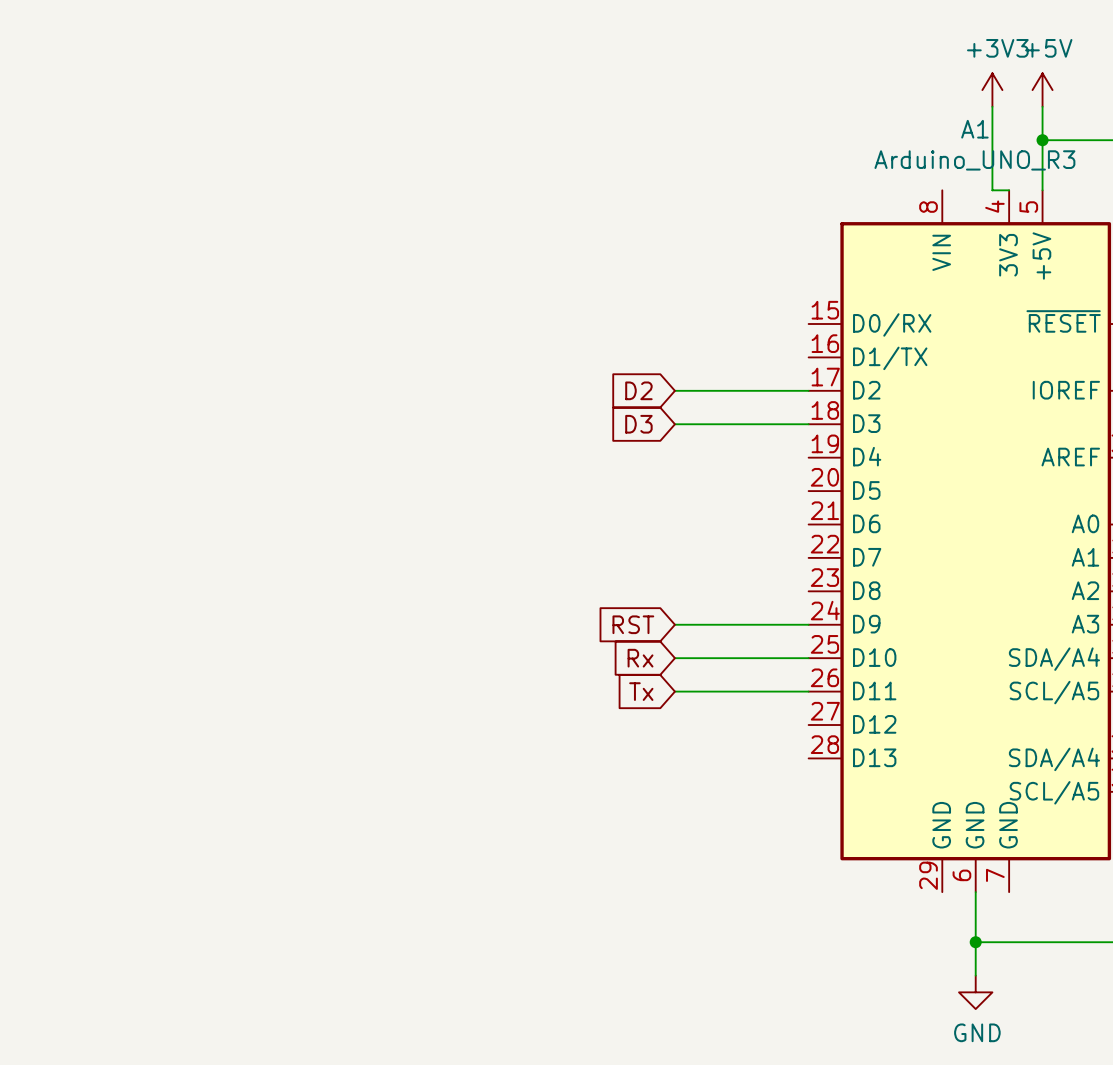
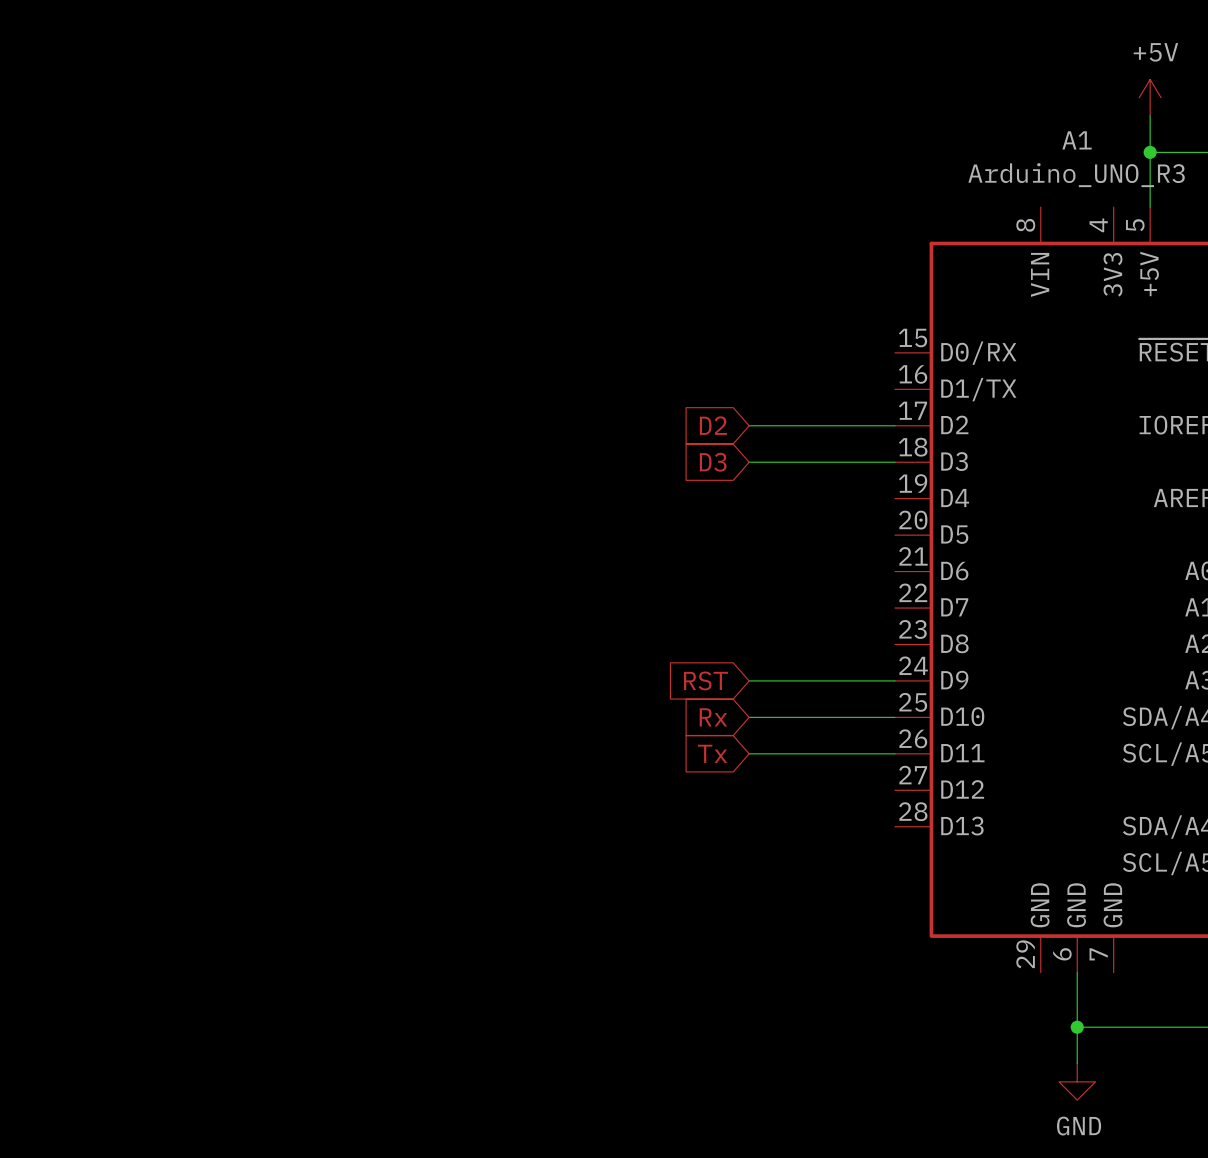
power symbol: +3V3 (992, 90) -> none
wire: (992, 106) (992, 190) (1009, 190) -> none

